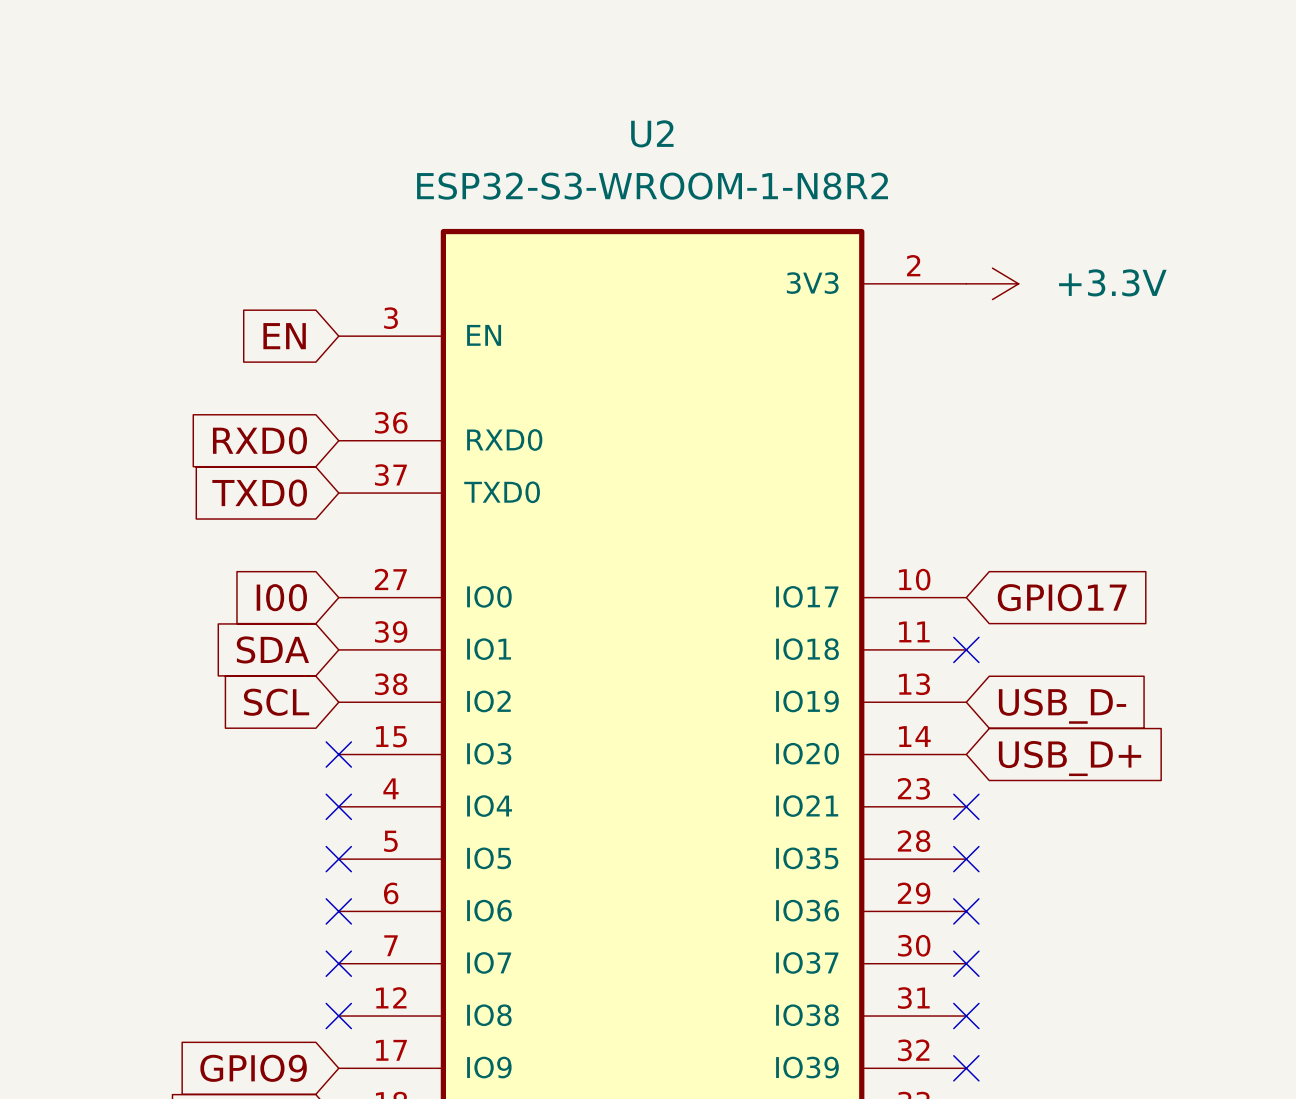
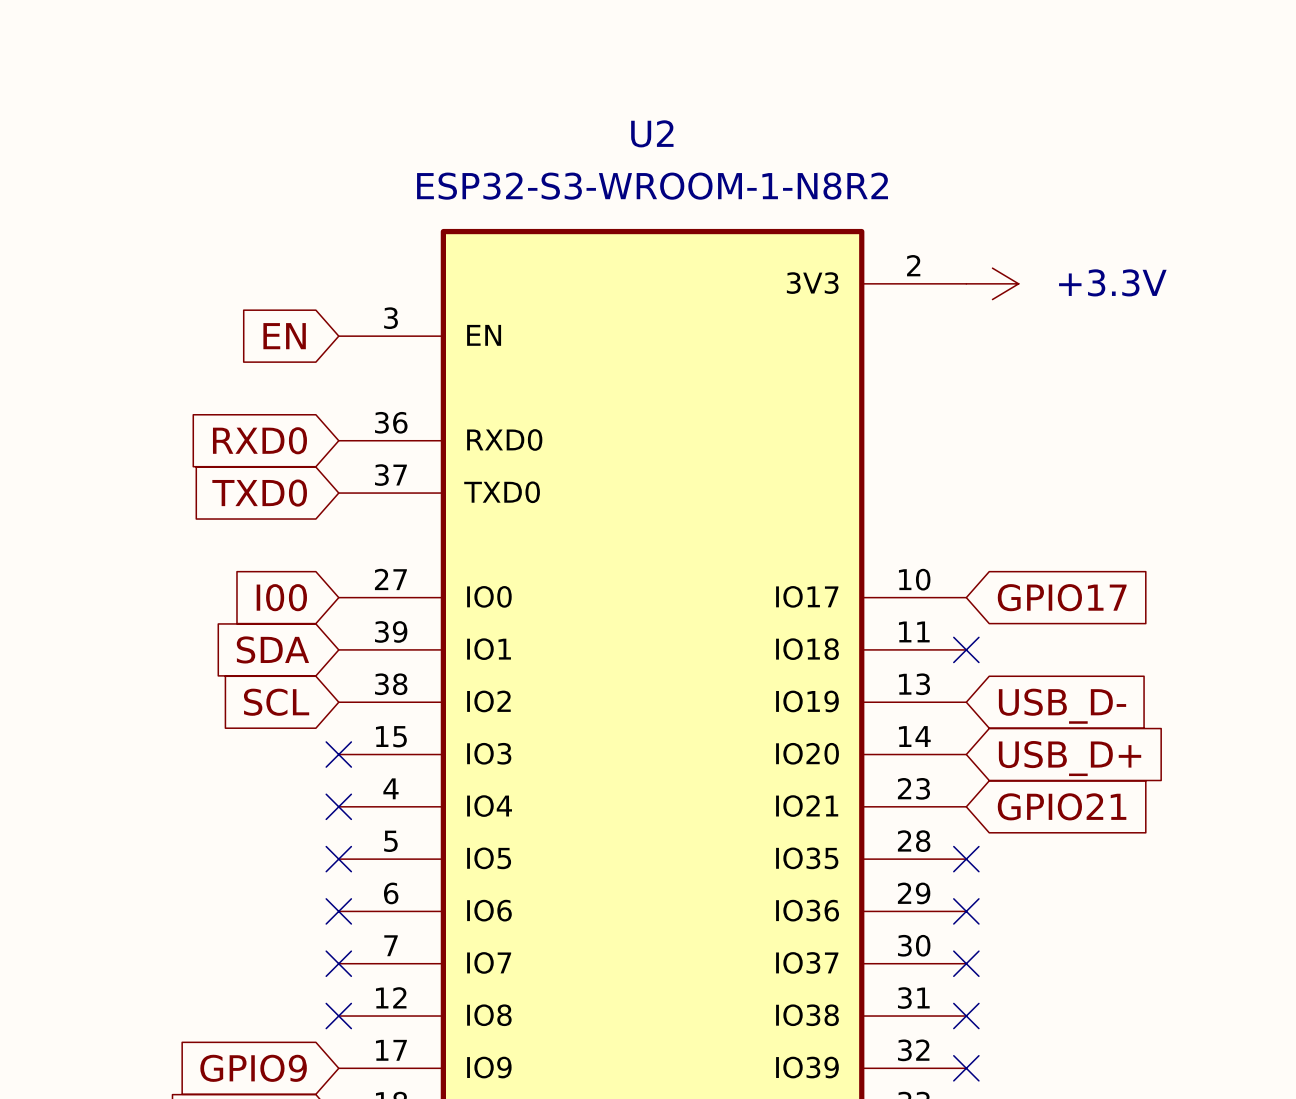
no-connect mark: (966, 806) -> none
global label: none -> GPIO21 (1062, 806)

